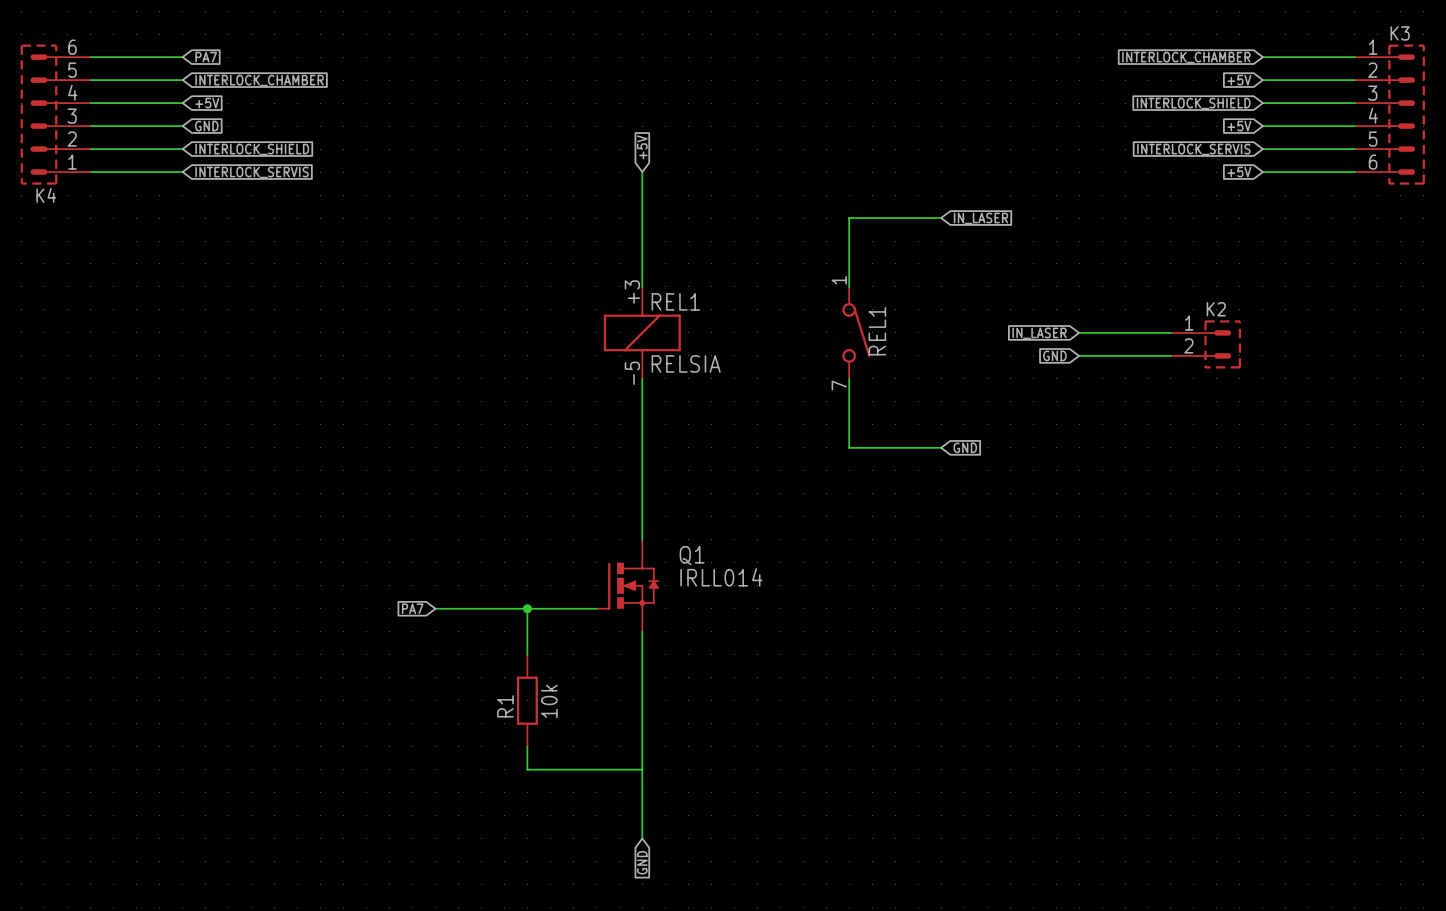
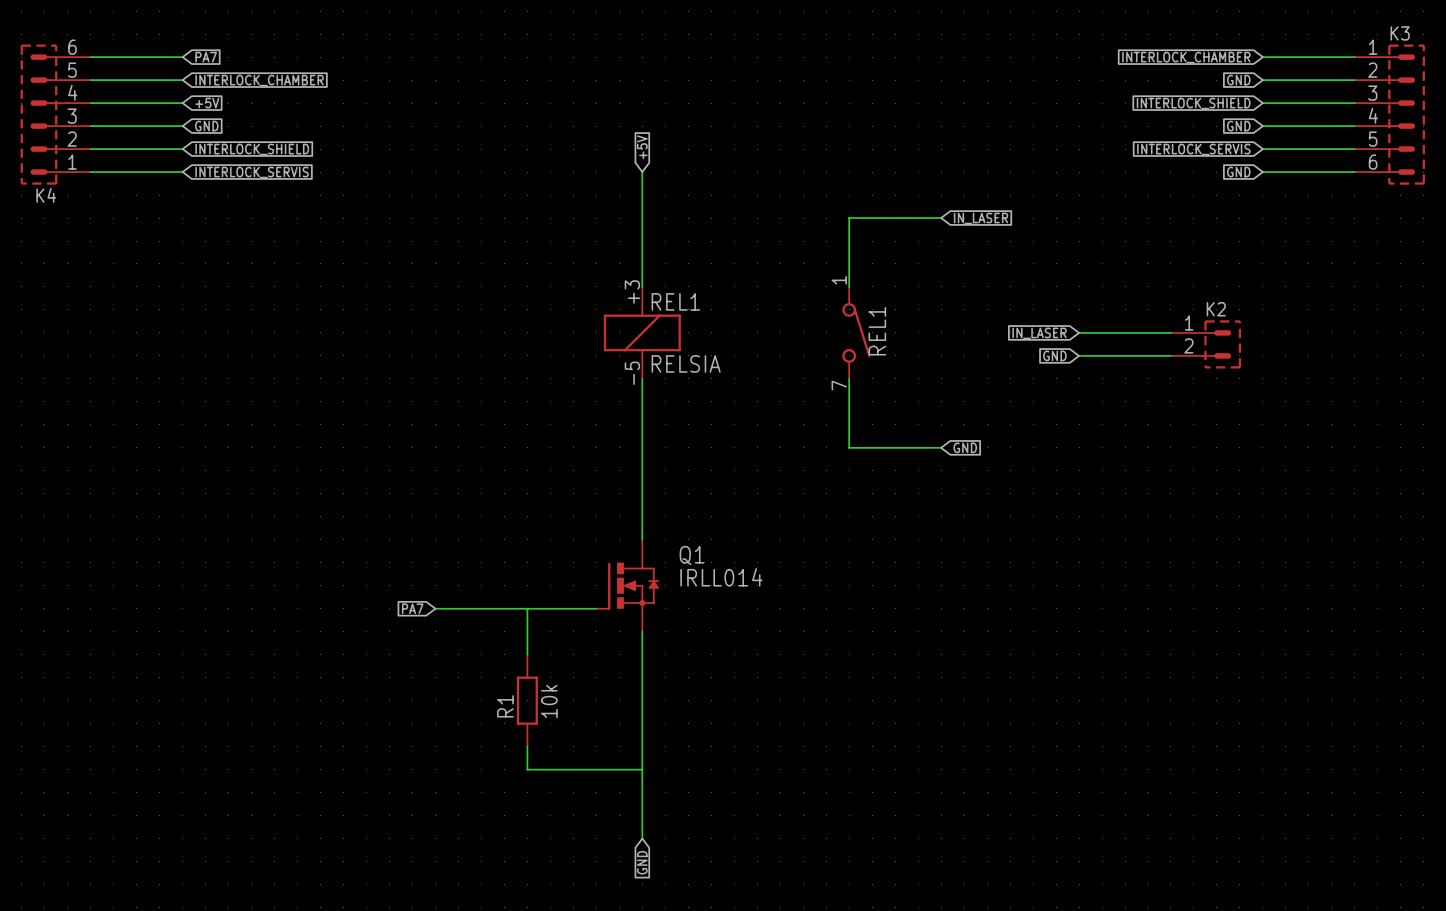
global label: +5V (1239, 80) -> GND (1238, 80)
global label: +5V (1239, 126) -> GND (1238, 126)
global label: +5V (1239, 172) -> GND (1238, 172)
junction: (527, 608) -> none

